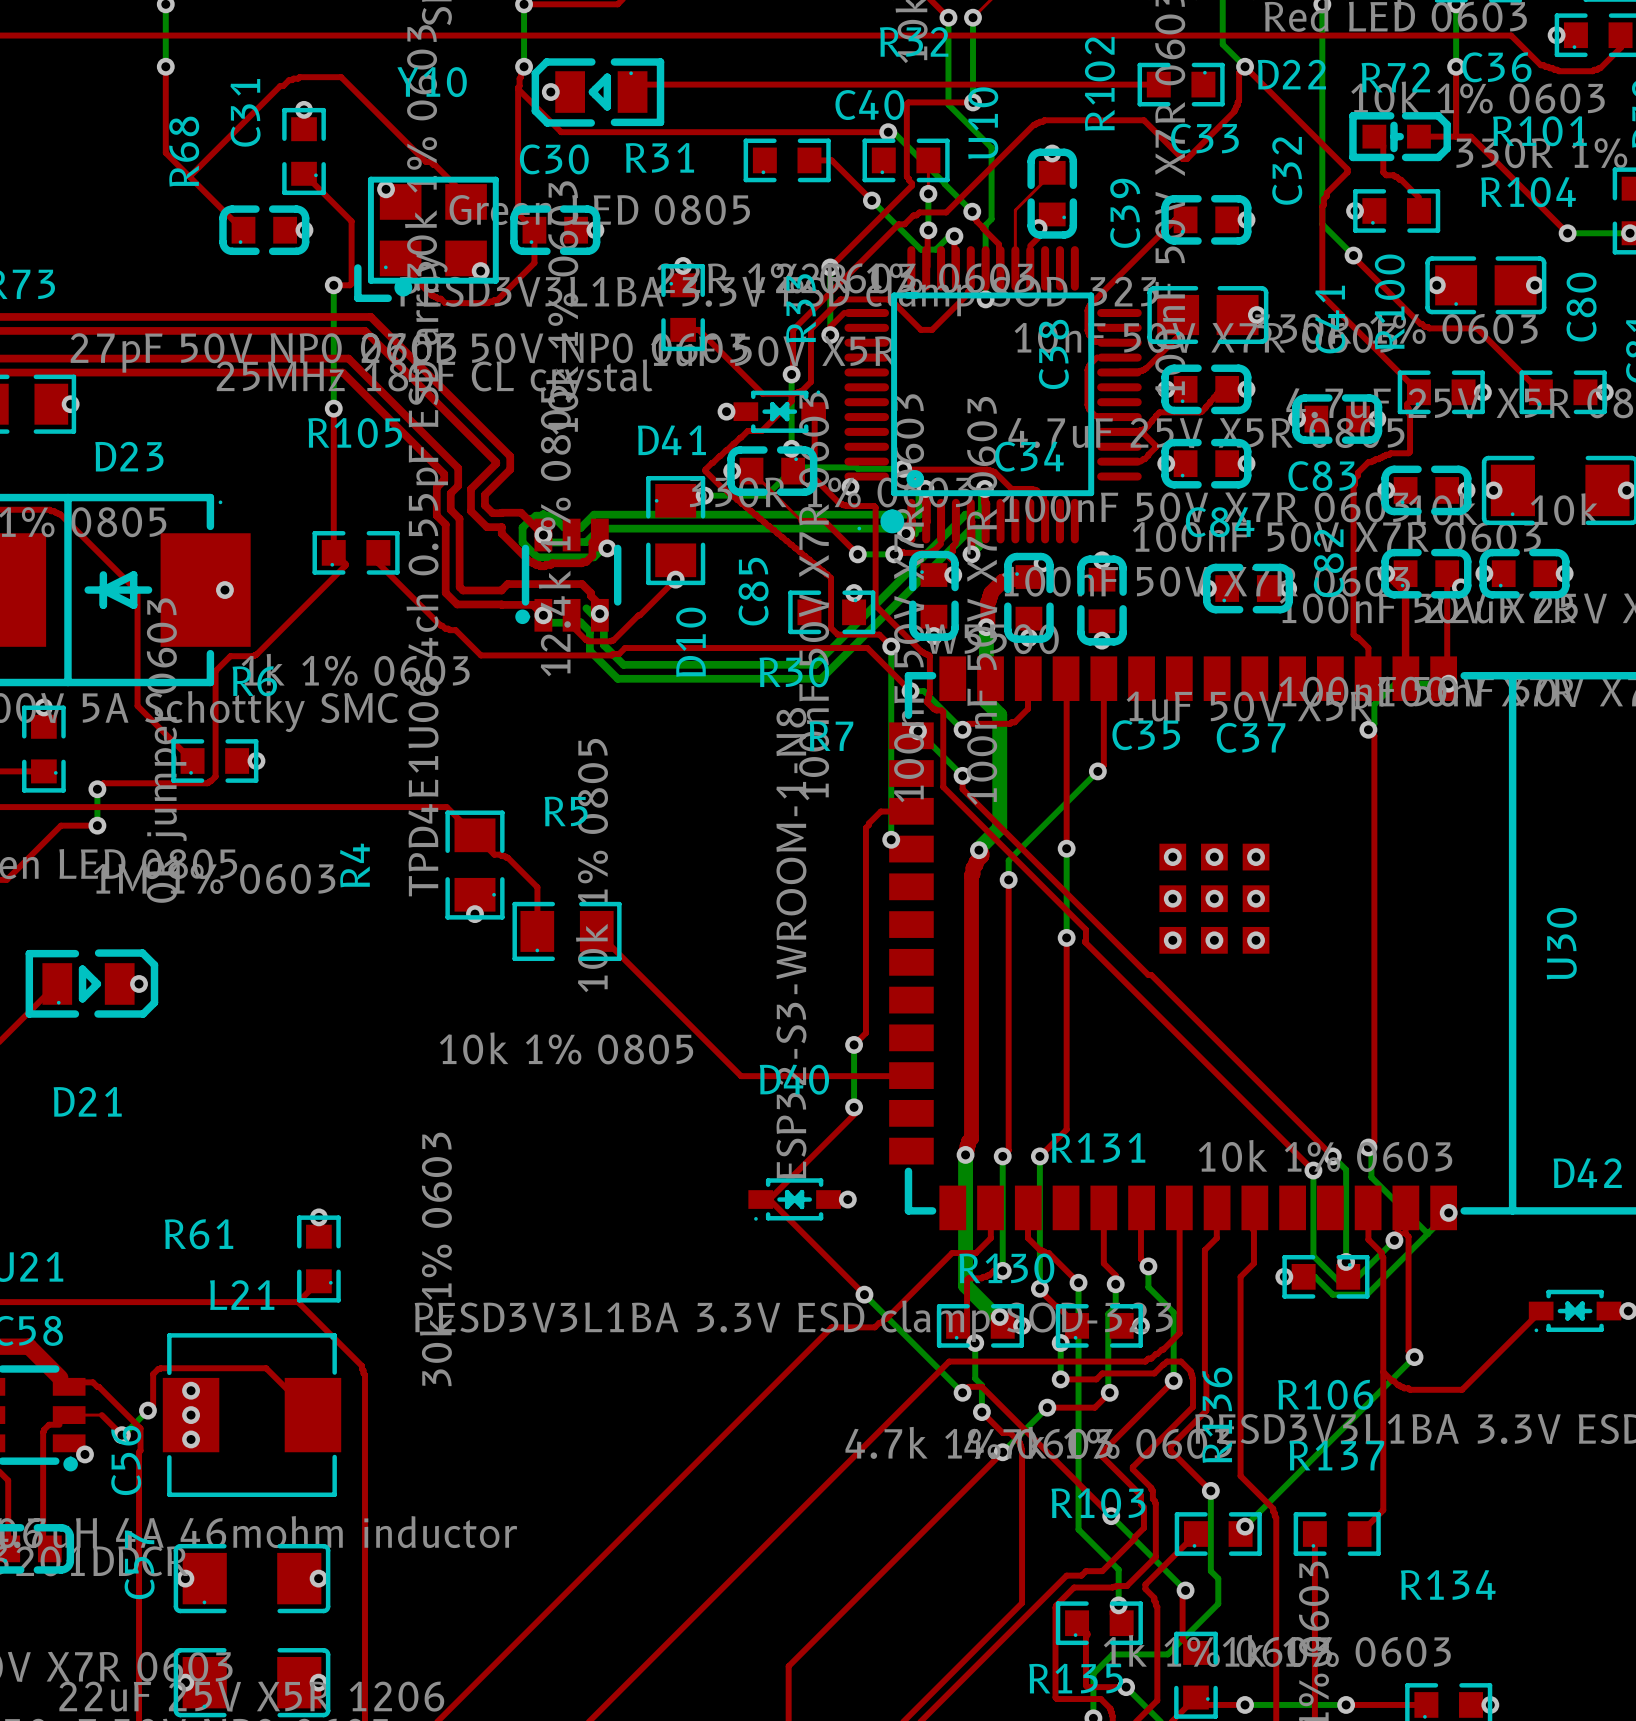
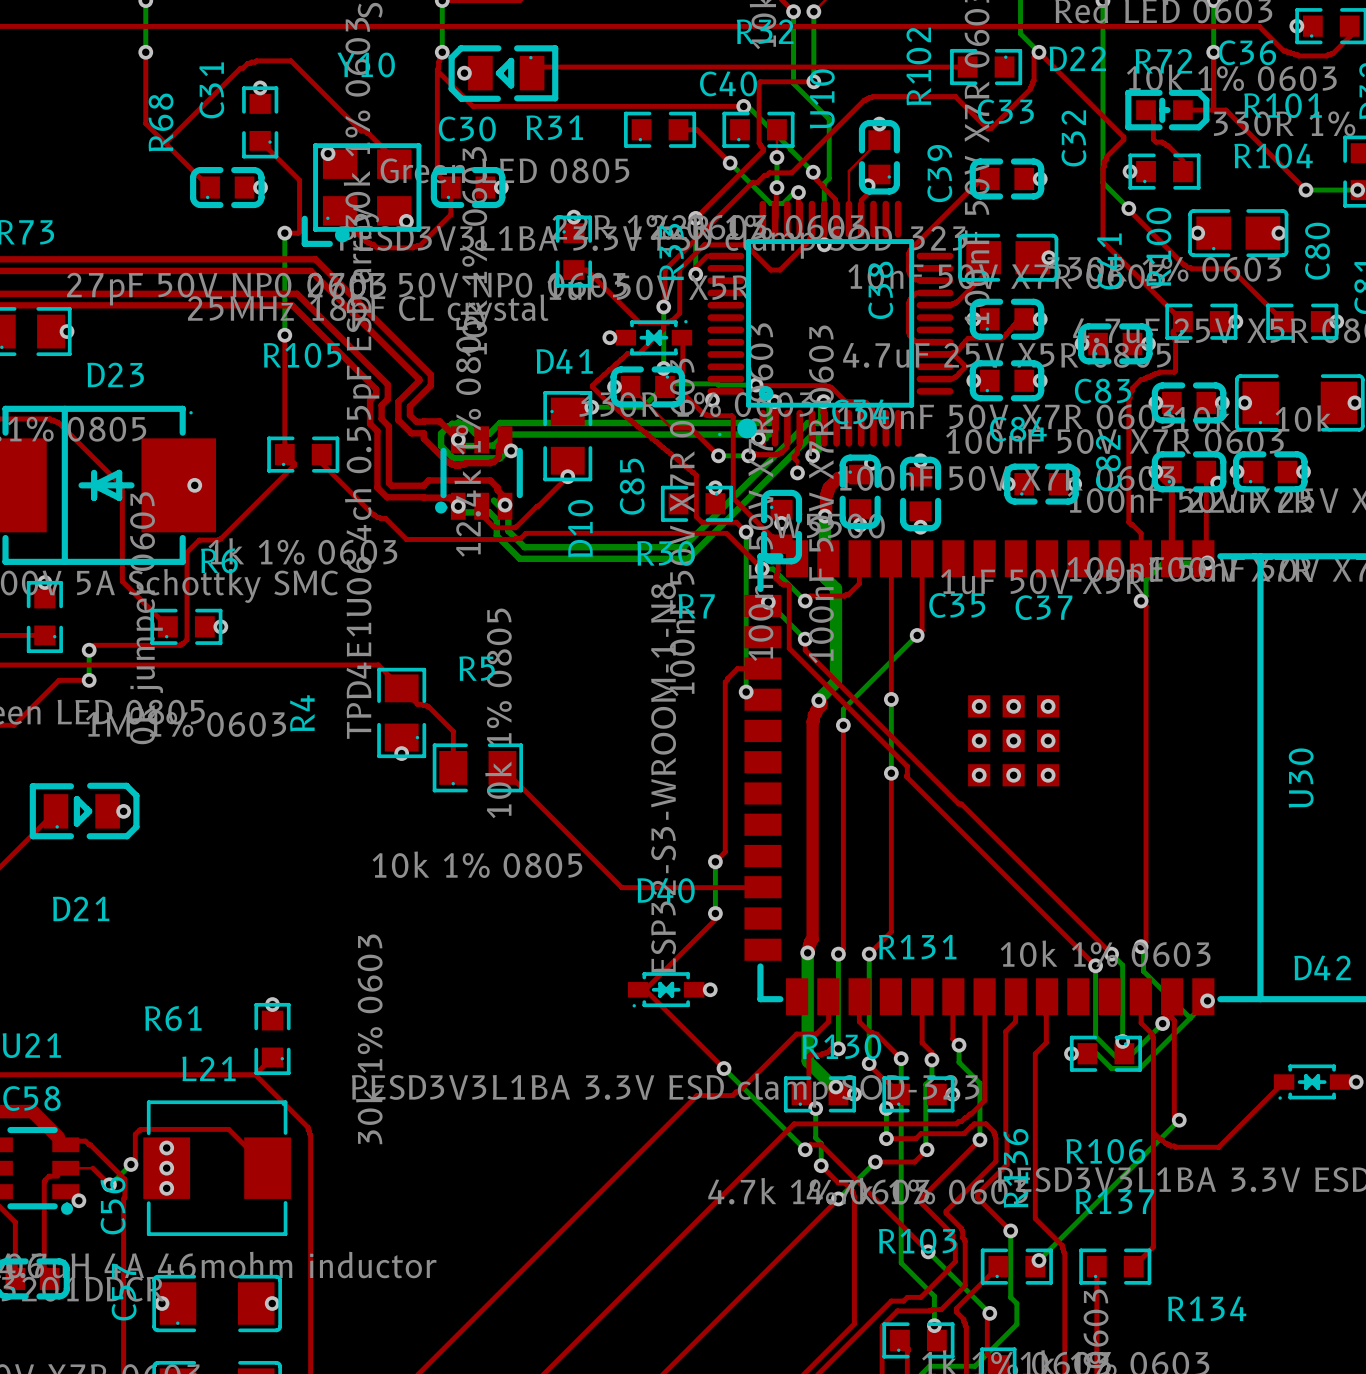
C34 position: (933, 595) -> (781, 527)

